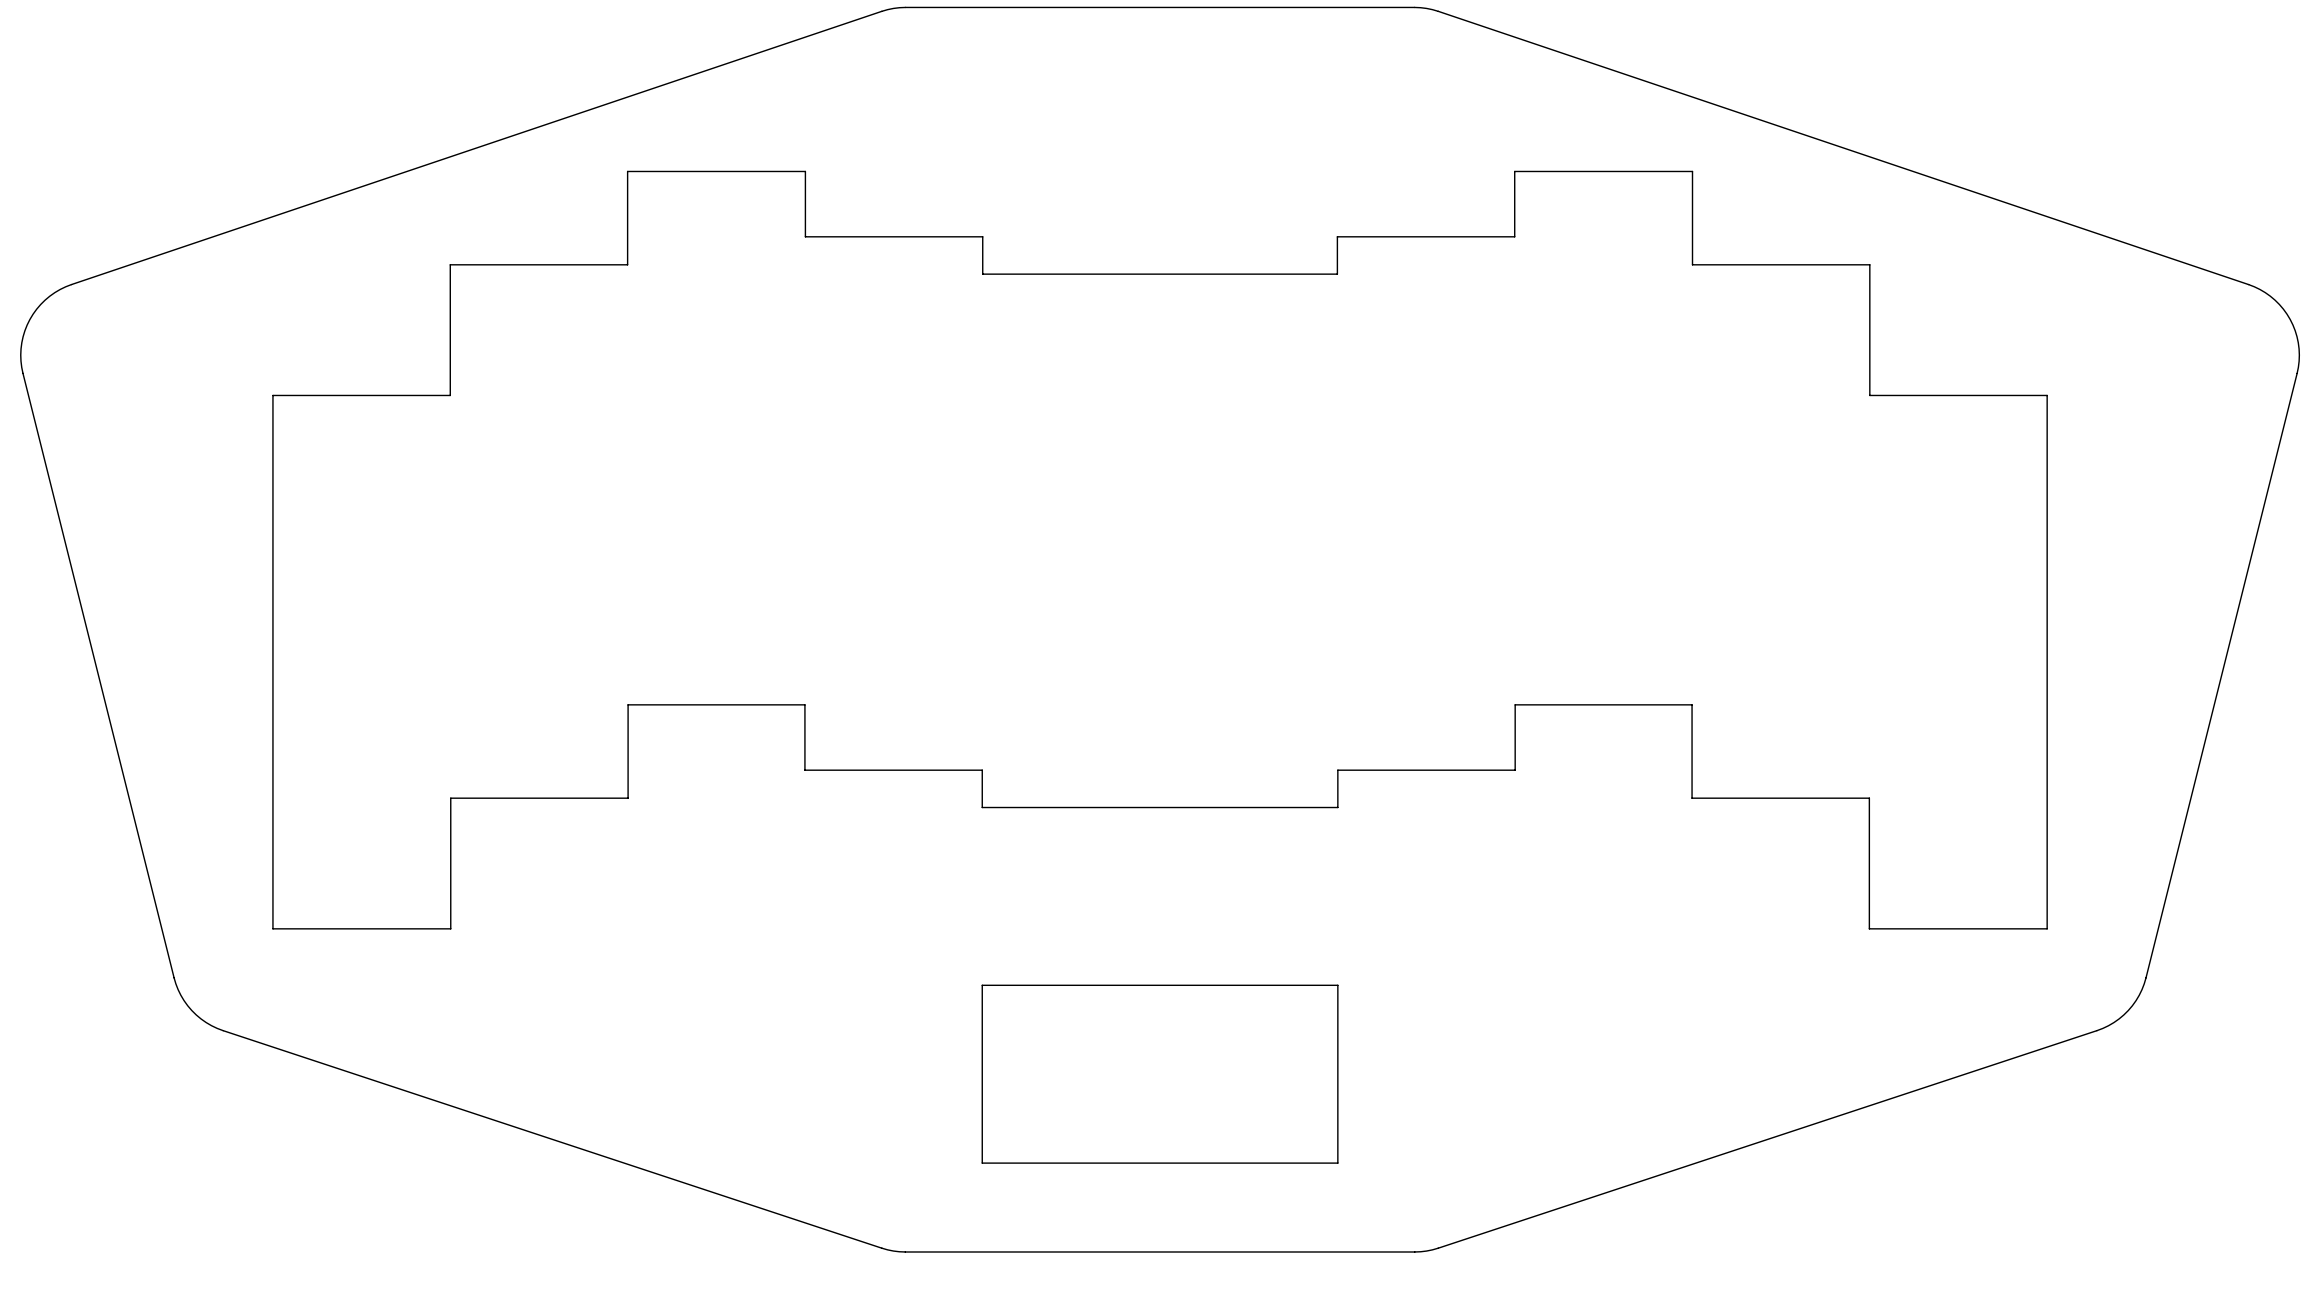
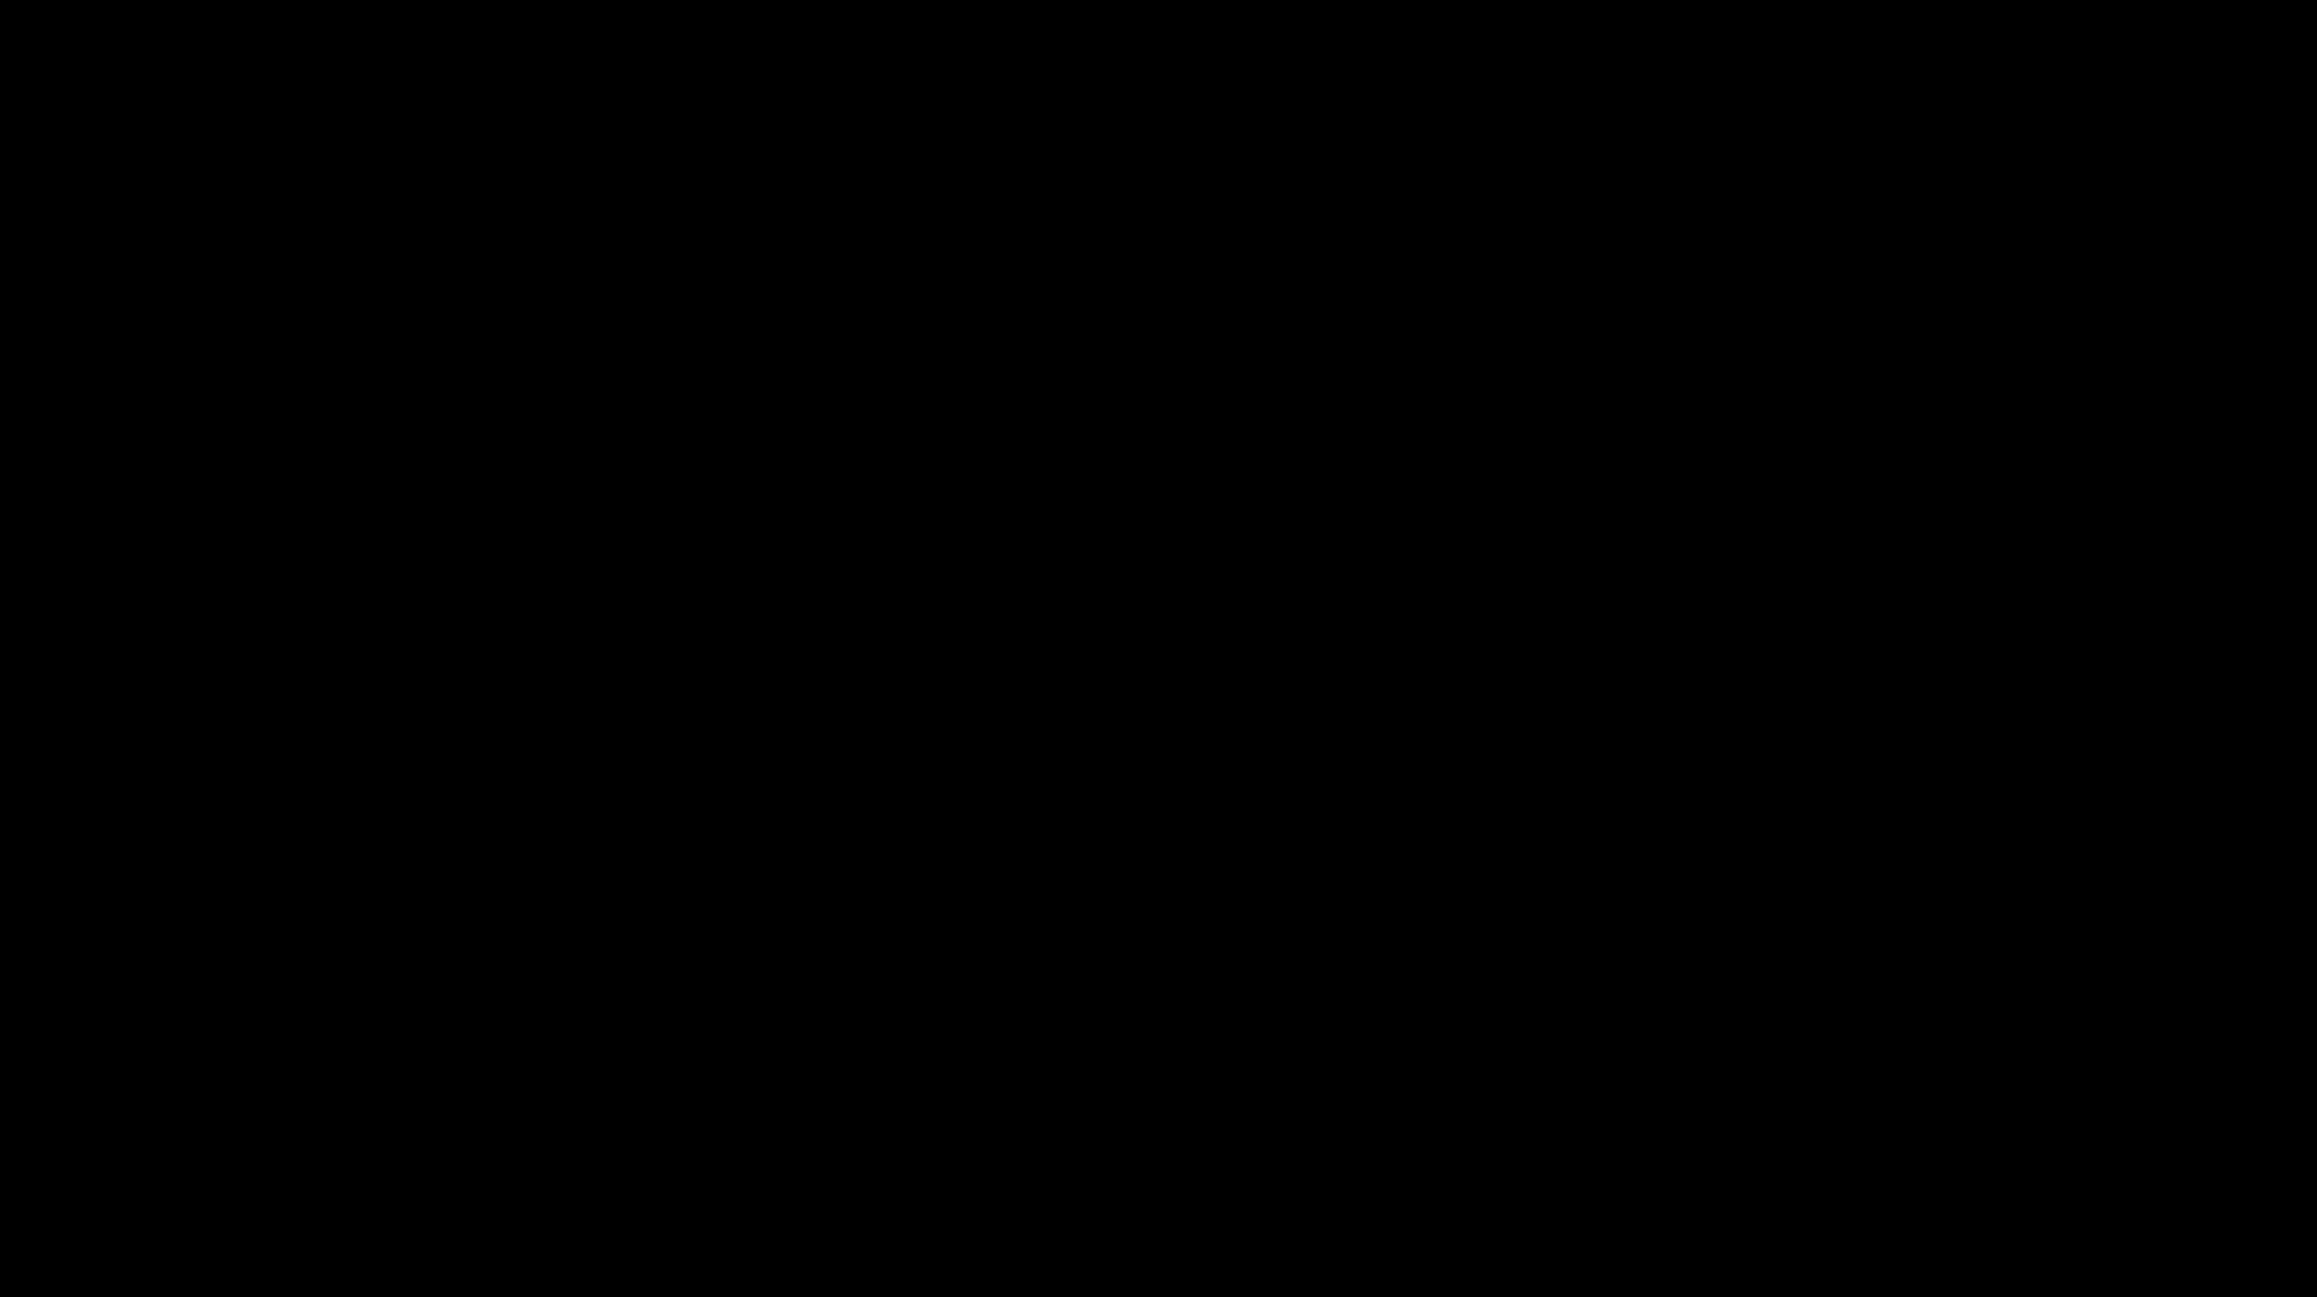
board edge: (1414, 7) (905, 7) (887, 9) (71, 284) (49, 296) (36, 309) (27, 325) (21, 342) (21, 367) (174, 977) (180, 995) (187, 1005) (206, 1022) (223, 1030) (881, 1248) (905, 1251) (1426, 1251) (2097, 1030) (2119, 1018) (2136, 1000) (2146, 977) (2297, 373) (2299, 361) (2298, 342) (2295, 330) (2287, 314) (2270, 296) (2248, 284) (1438, 11) (1414, 7) -> none
board edge: (1692, 171) (1514, 171) (1514, 236) (1337, 236) (1337, 274) (982, 274) (982, 236) (805, 236) (805, 171) (627, 171) (627, 264) (450, 264) (450, 395) (272, 395) (272, 928) (450, 928) (450, 798) (628, 798) (628, 704) (804, 704) (804, 770) (982, 770) (982, 807) (1337, 807) (1337, 770) (1515, 770) (1515, 704) (1692, 704) (1692, 798) (1869, 798) (1869, 928) (2047, 928) (2047, 395) (1869, 395) (1869, 264) (1692, 264) (1692, 171) -> none
board edge: (1337, 985) (1337, 1163) (982, 1163) (982, 985) (1337, 985) -> none

